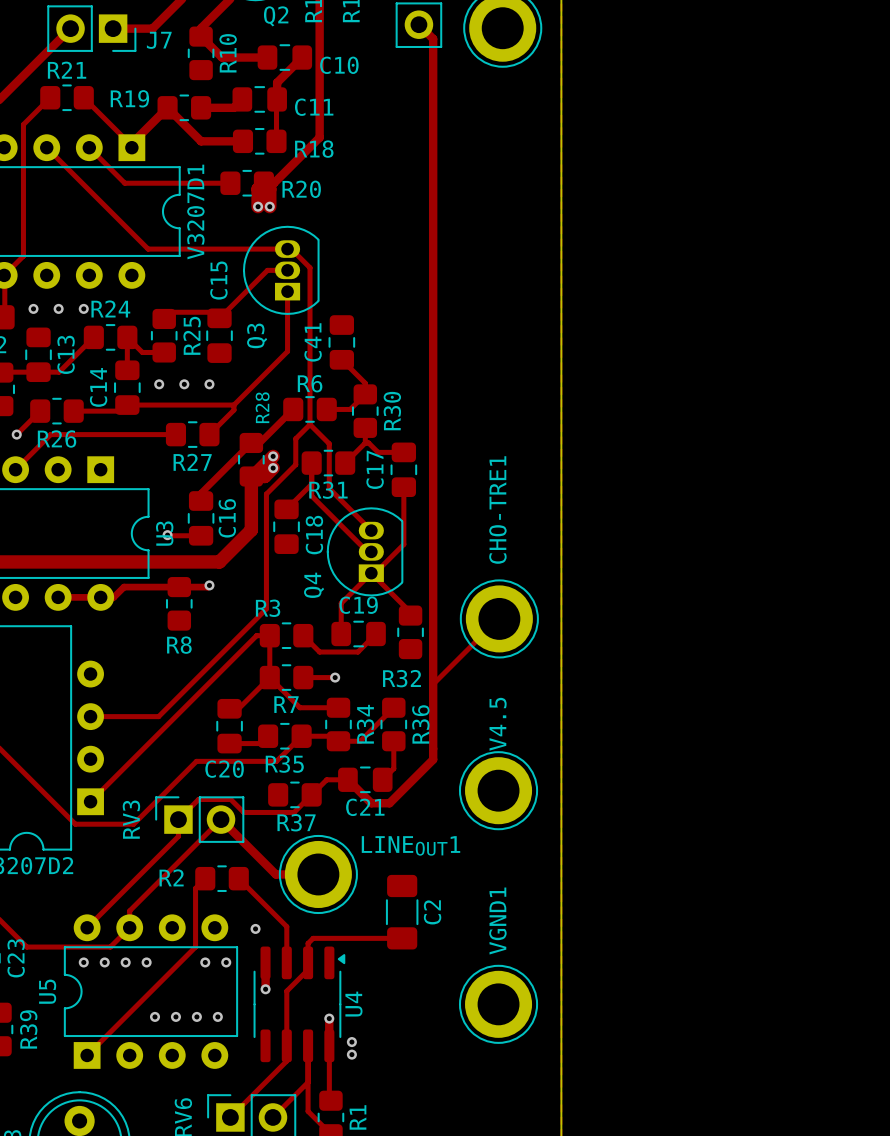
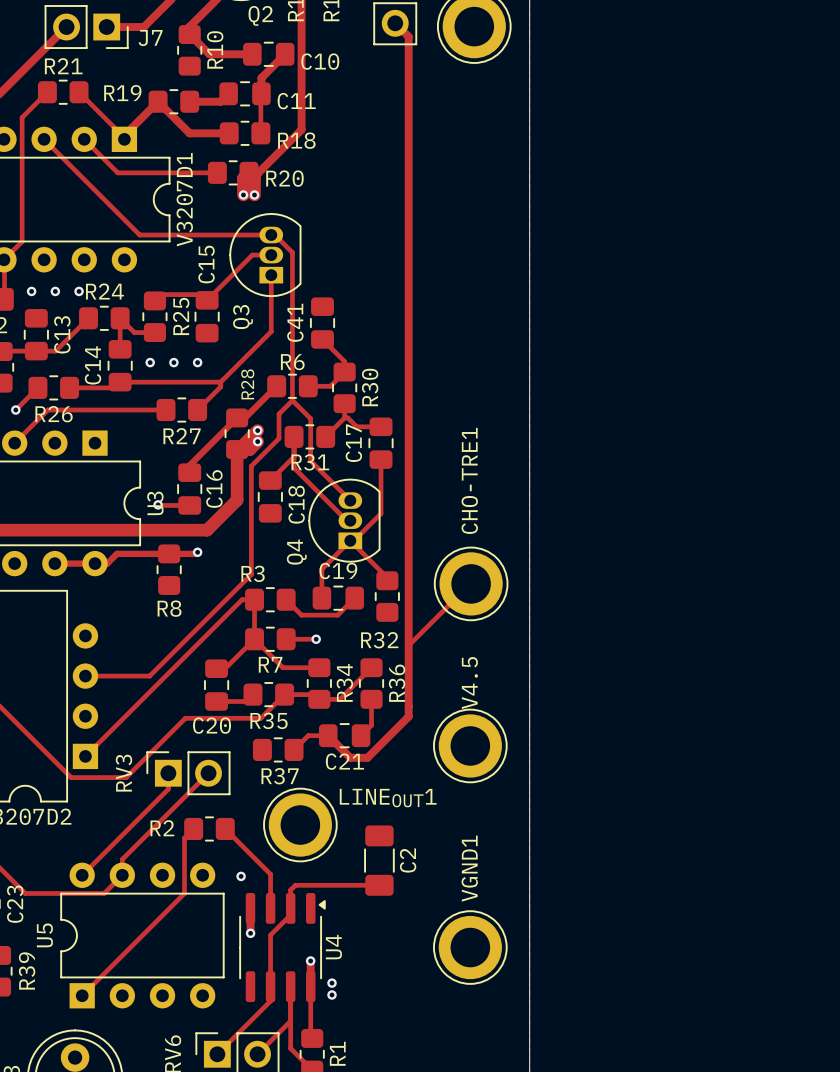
track: (311, 794) (294, 812) (243, 812) (230, 799) (198, 799) (178, 819) -> none
track: (221, 819) (275, 874) (318, 874) -> none
via: (83, 962) -> none
via: (104, 962) -> none
via: (125, 962) -> none
via: (146, 962) -> none
via: (205, 962) -> none
via: (226, 962) -> none
via: (155, 1016) -> none
via: (175, 1016) -> none
via: (196, 1016) -> none
via: (217, 1016) -> none

